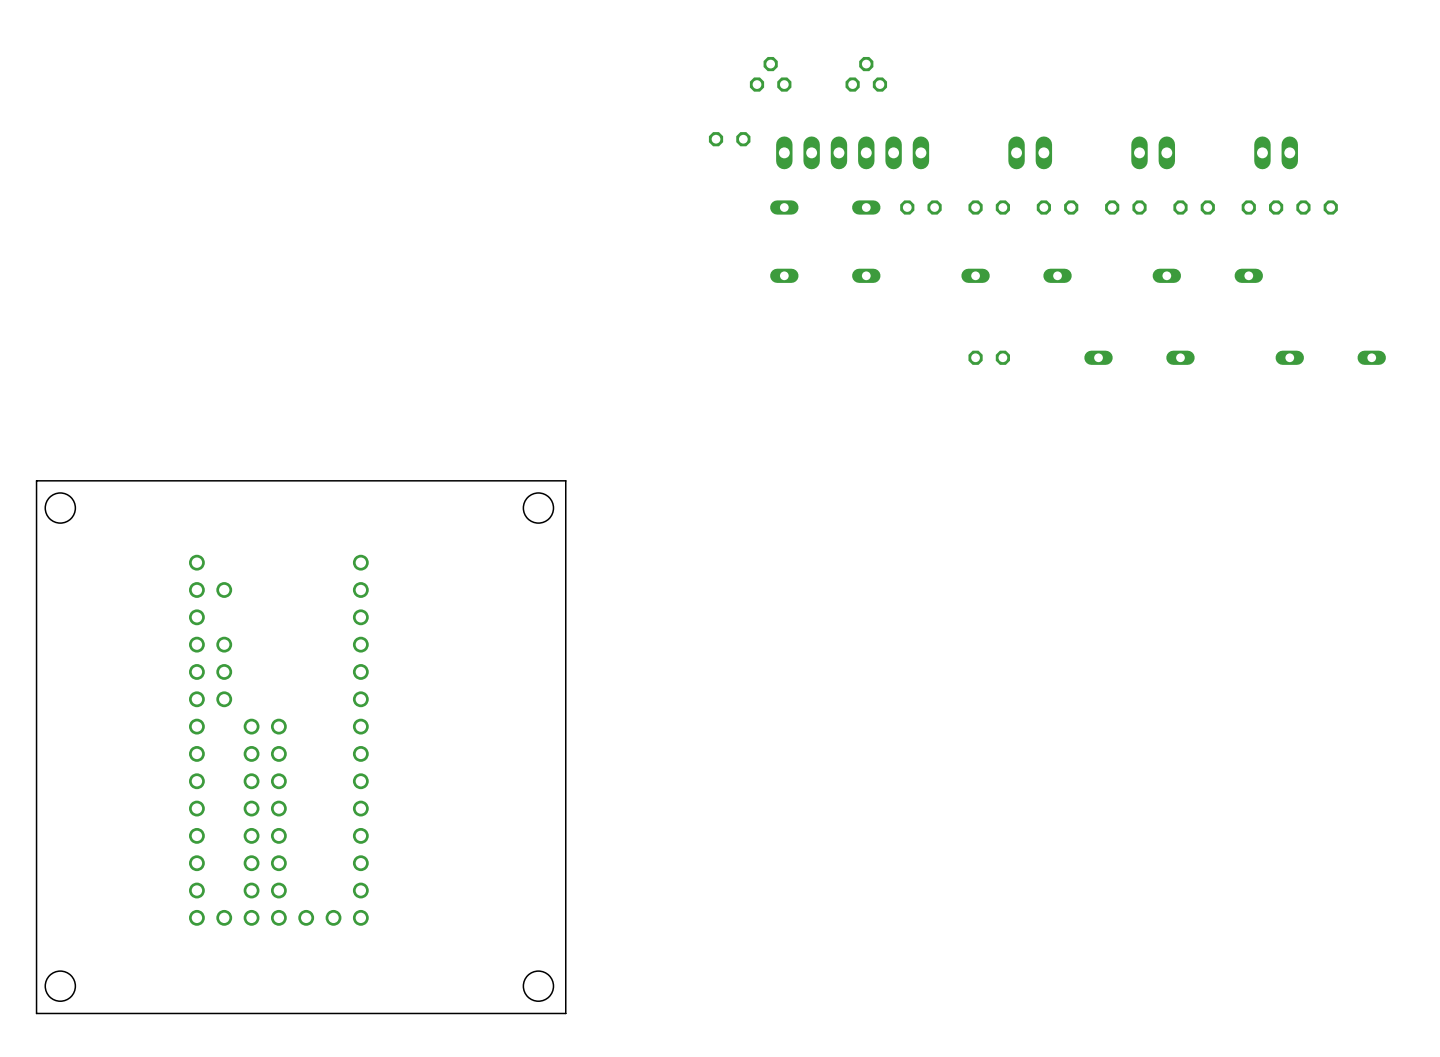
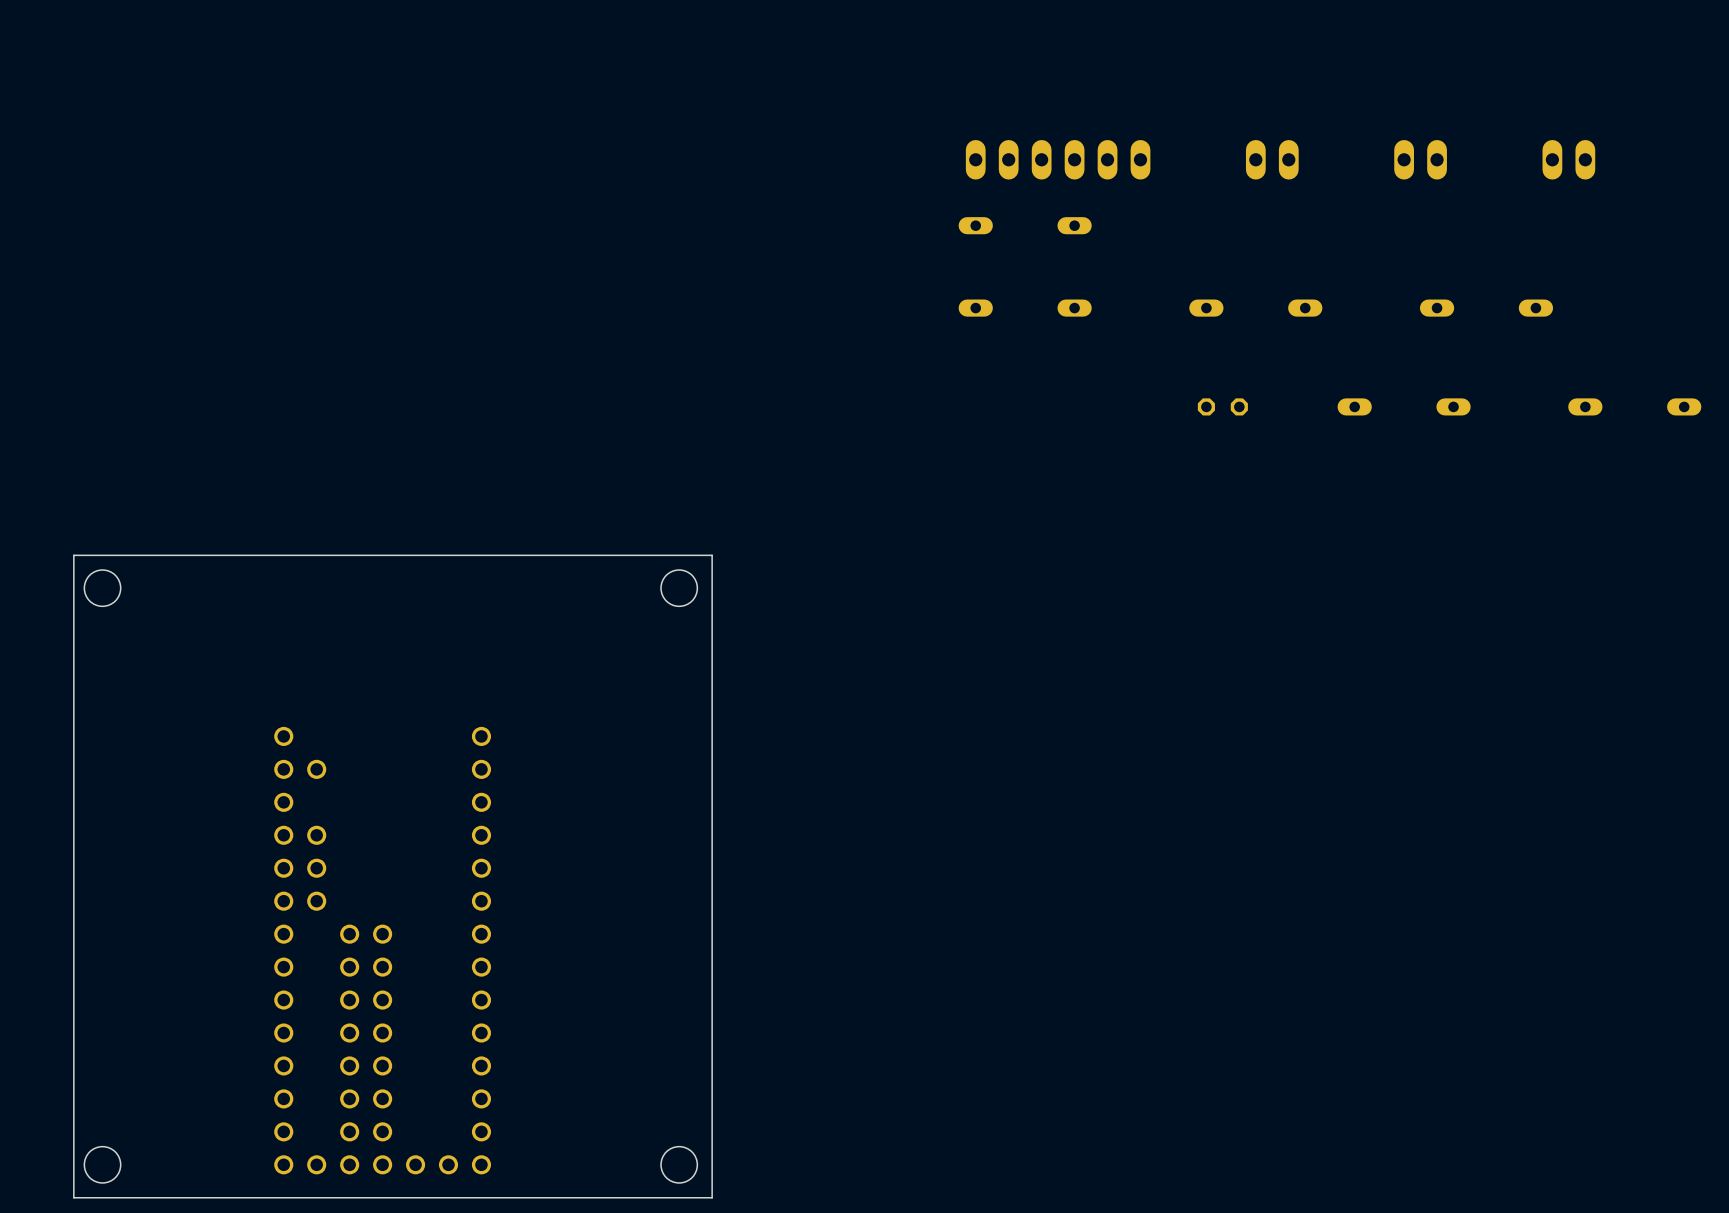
part: (770, 74) -> none
part: (866, 74) -> none
part: (729, 139) -> none
part: (920, 207) -> none
part: (989, 207) -> none
part: (1057, 207) -> none
part: (1125, 207) -> none
part: (1194, 207) -> none
part: (1262, 207) -> none
part: (1317, 207) -> none
part position: (278, 740) -> (382, 950)

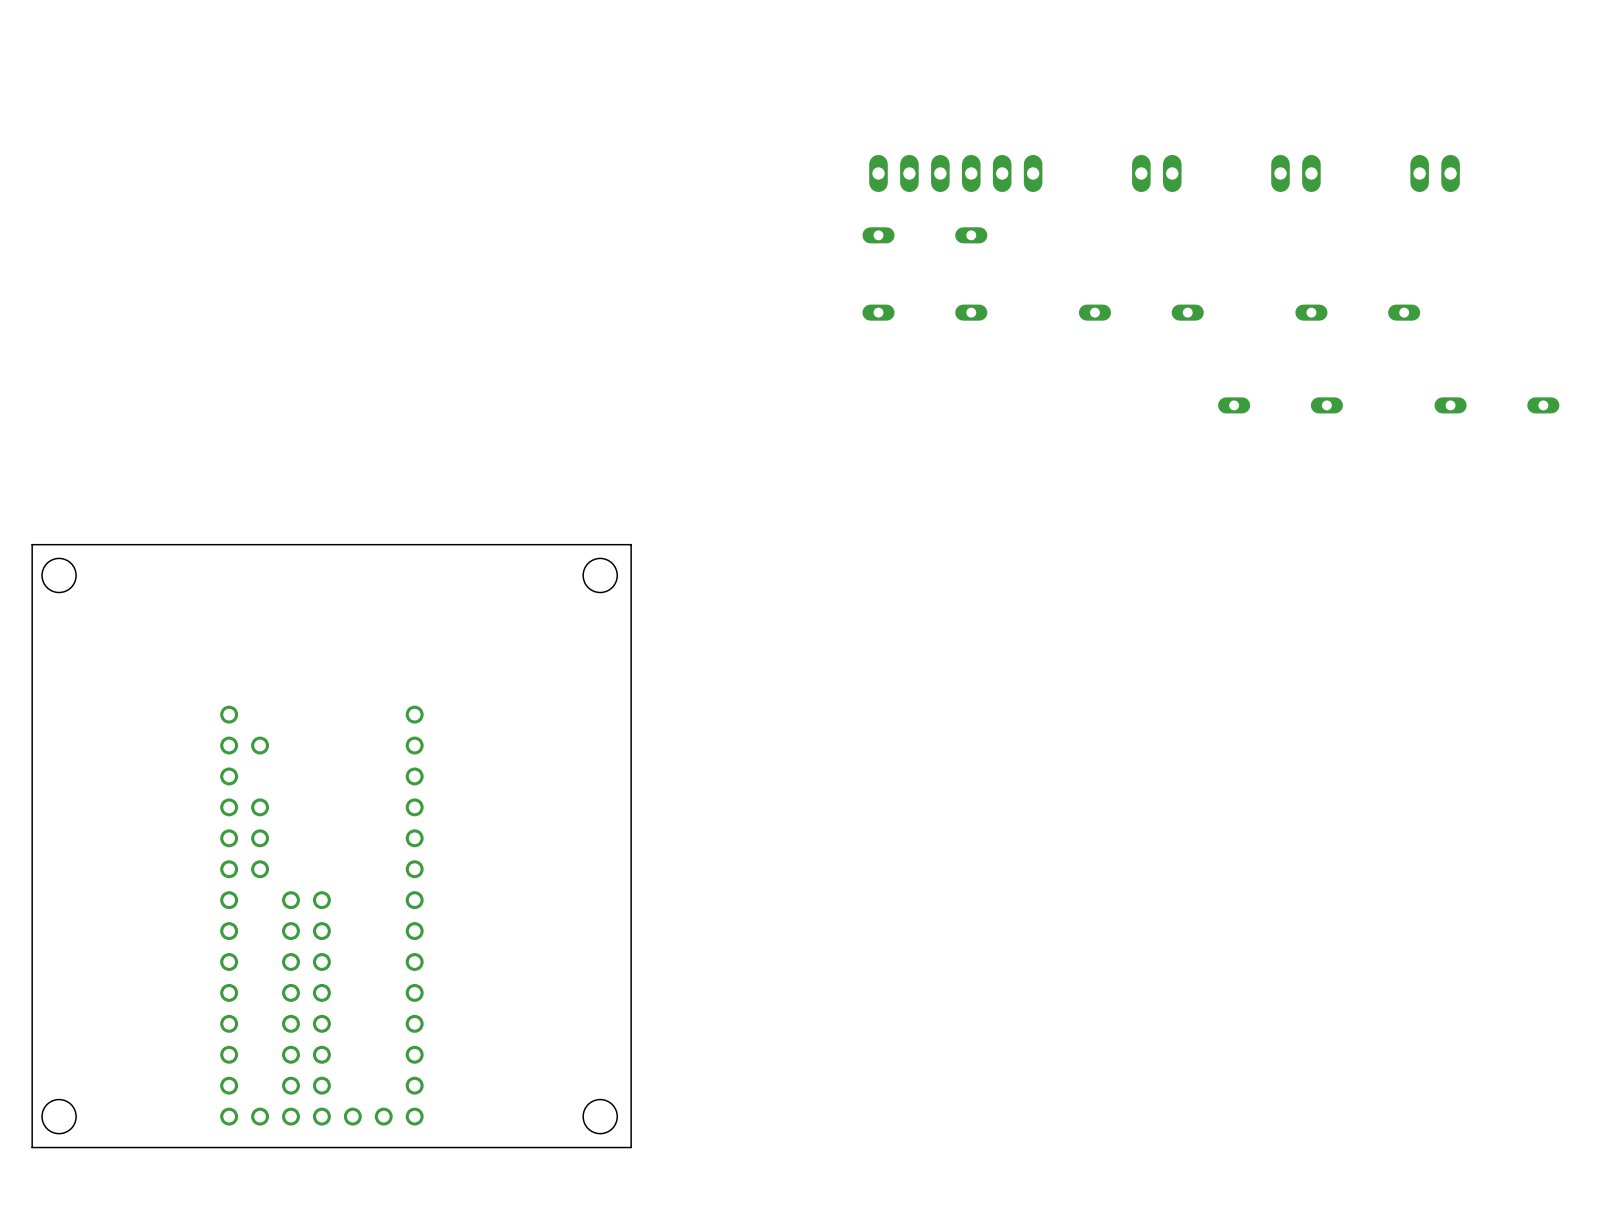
part: (1222, 406) -> none

